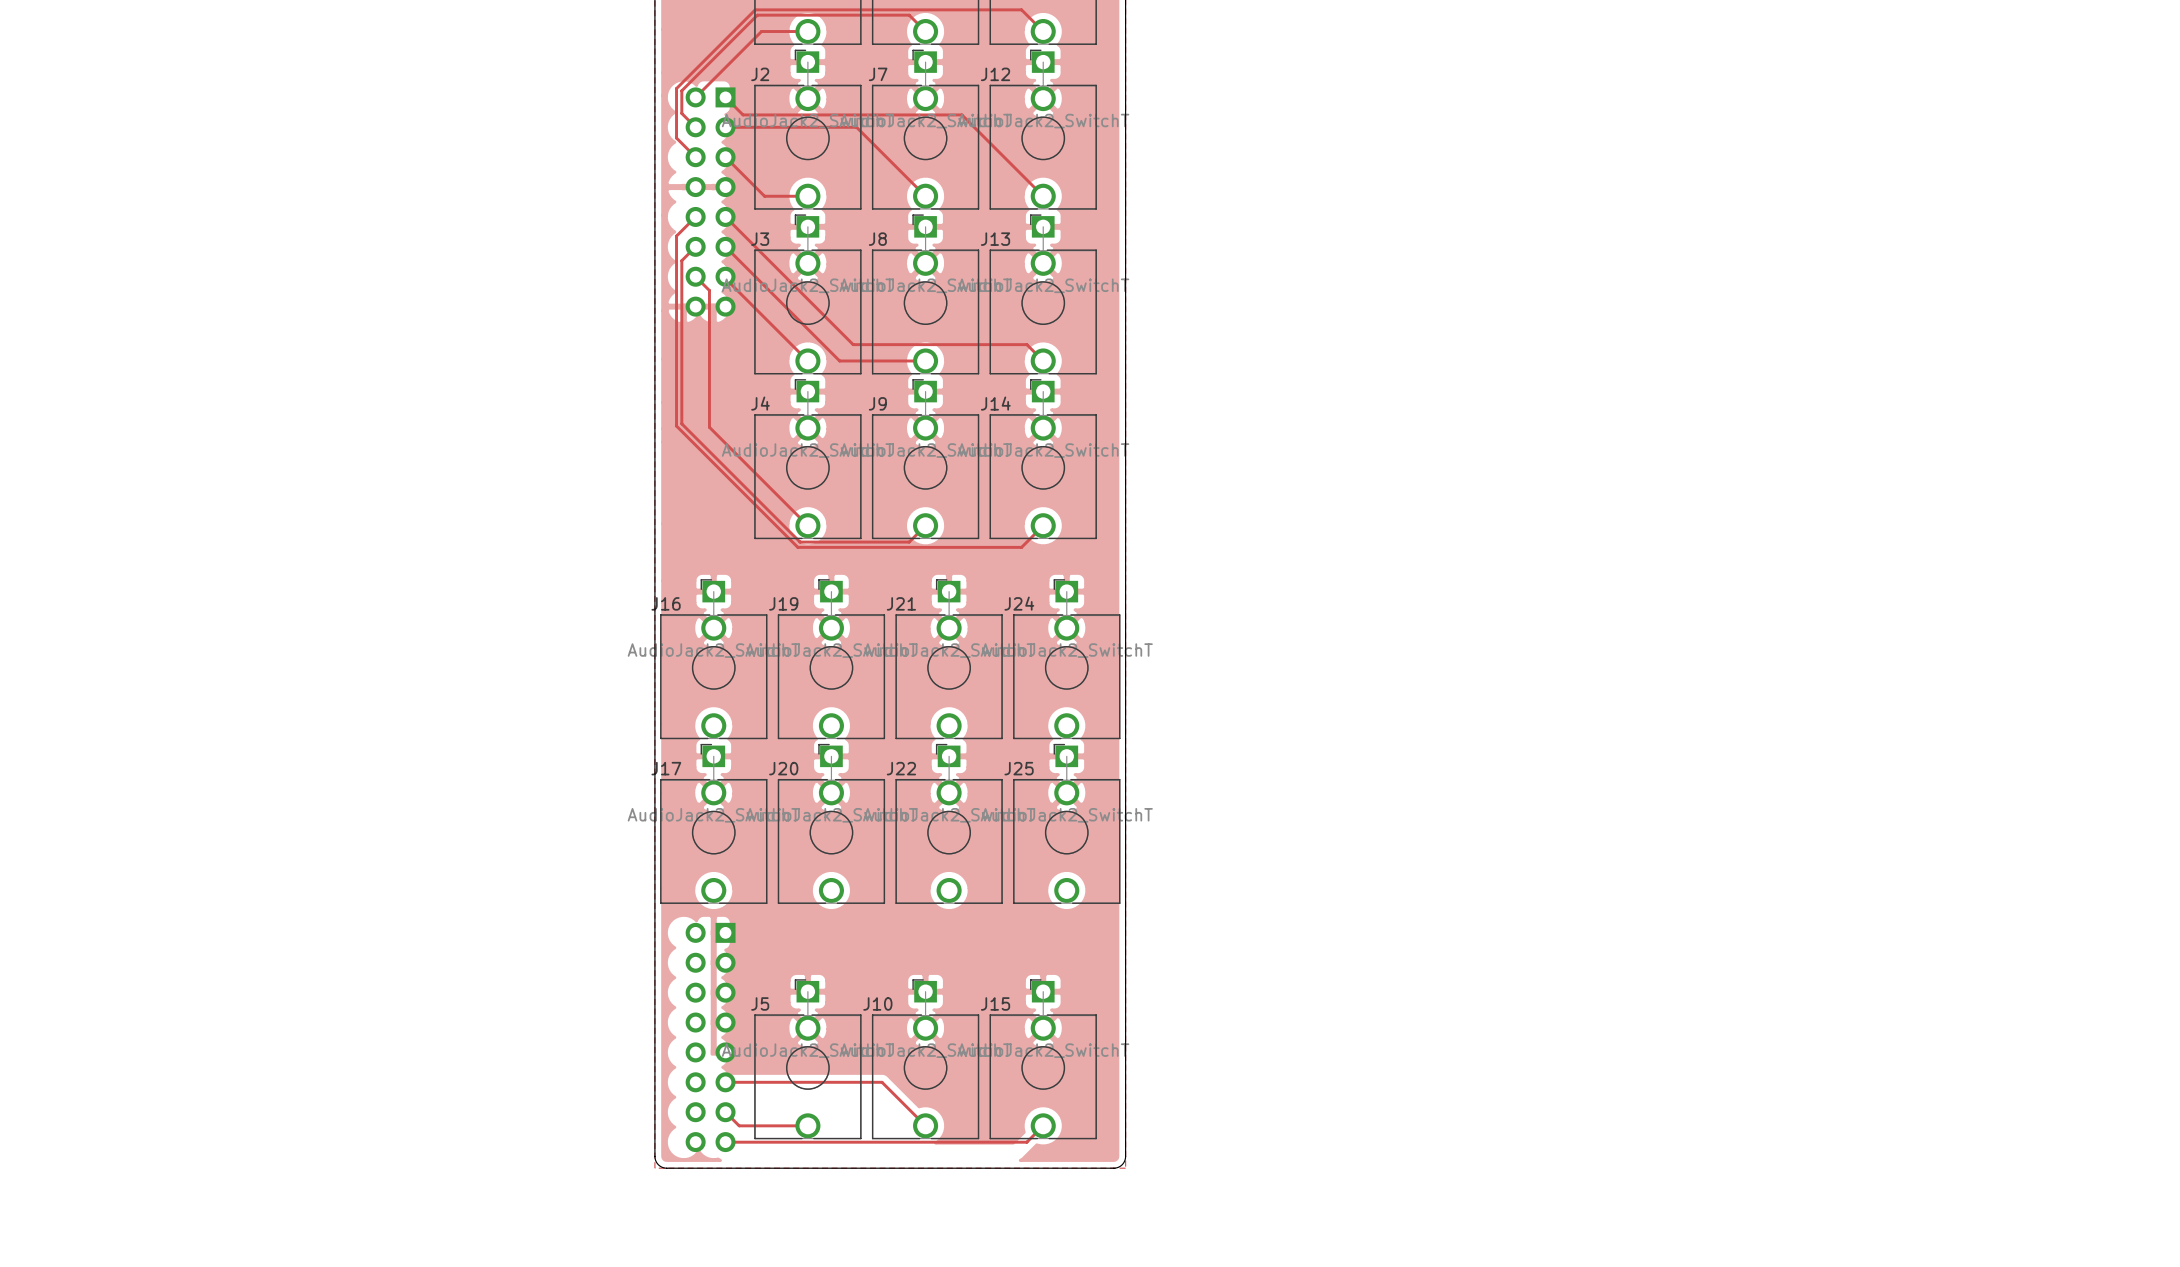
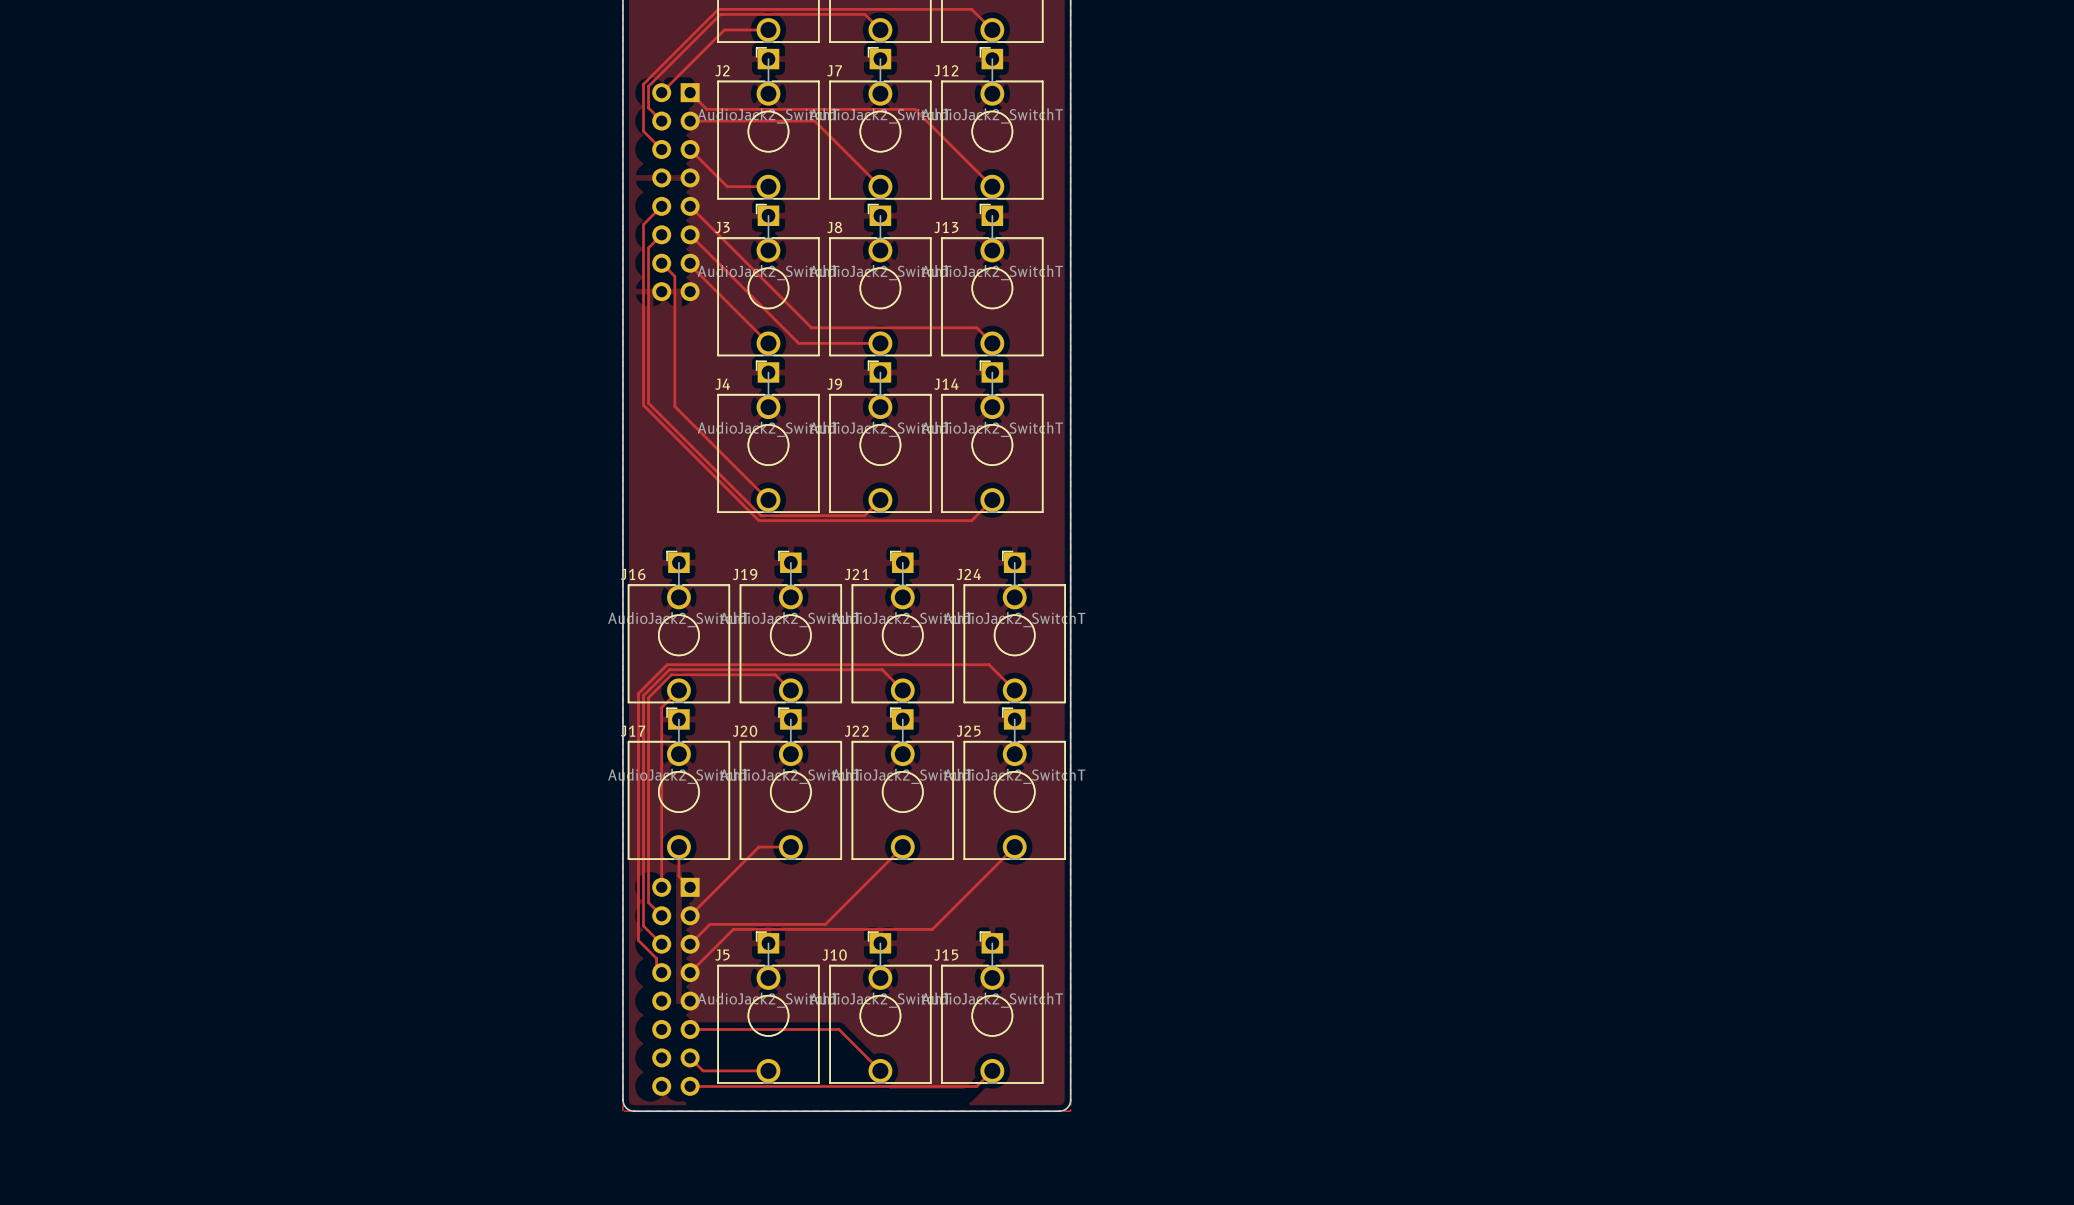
track: none -> (678, 690) (661, 707) (661, 887)
track: none -> (790, 690) (775, 674) (671, 674) (648, 697) (648, 902) (661, 915)
track: none -> (902, 690) (882, 669) (669, 669) (643, 695) (643, 926) (661, 944)
track: none -> (1014, 690) (989, 664) (667, 664) (638, 693) (638, 940) (656, 958) (656, 967) (661, 972)
track: none -> (678, 847) (678, 876) (690, 887)
track: none -> (790, 847) (758, 847) (690, 915)
track: none -> (902, 847) (825, 924) (709, 924) (690, 944)
track: none -> (1014, 847) (932, 929) (733, 929) (690, 972)

